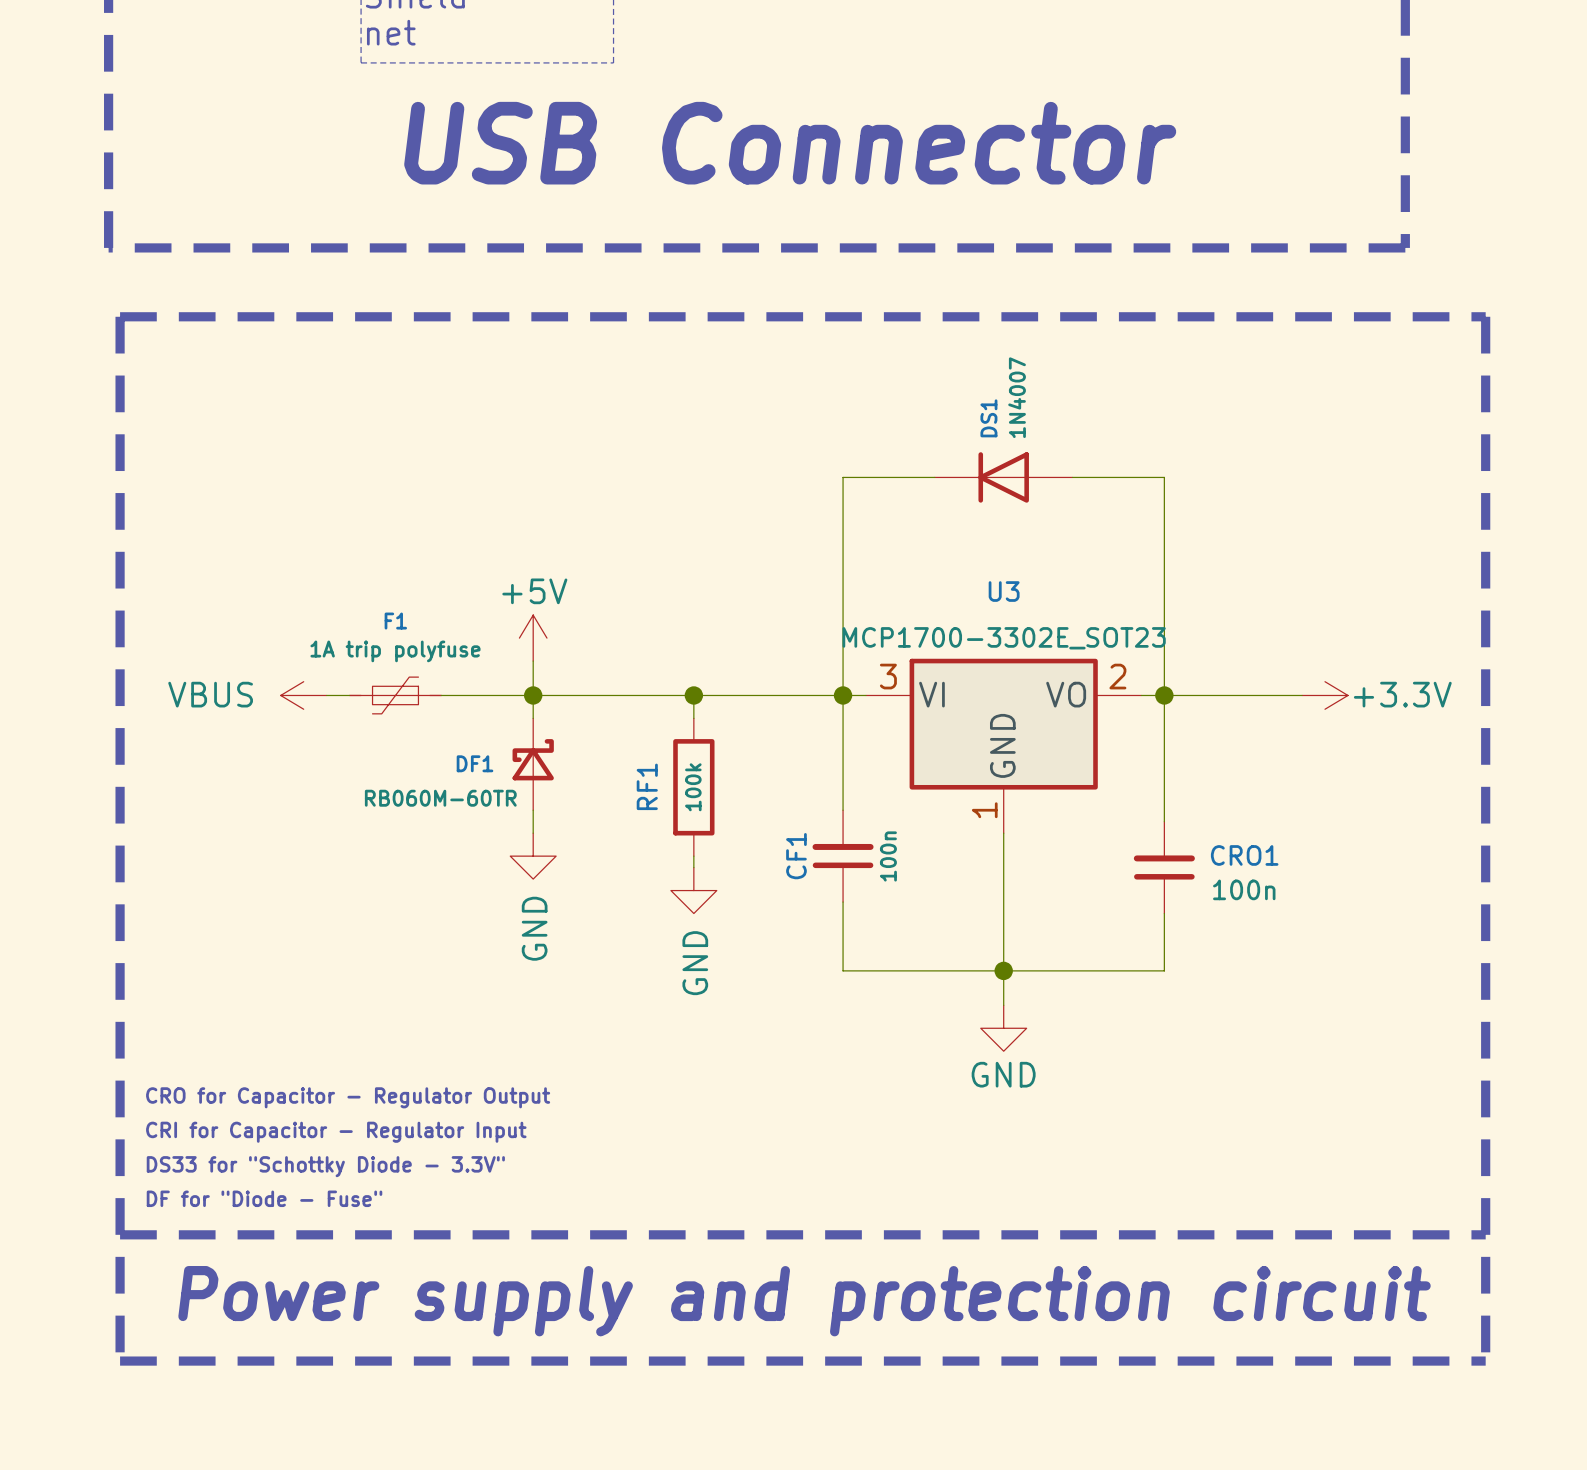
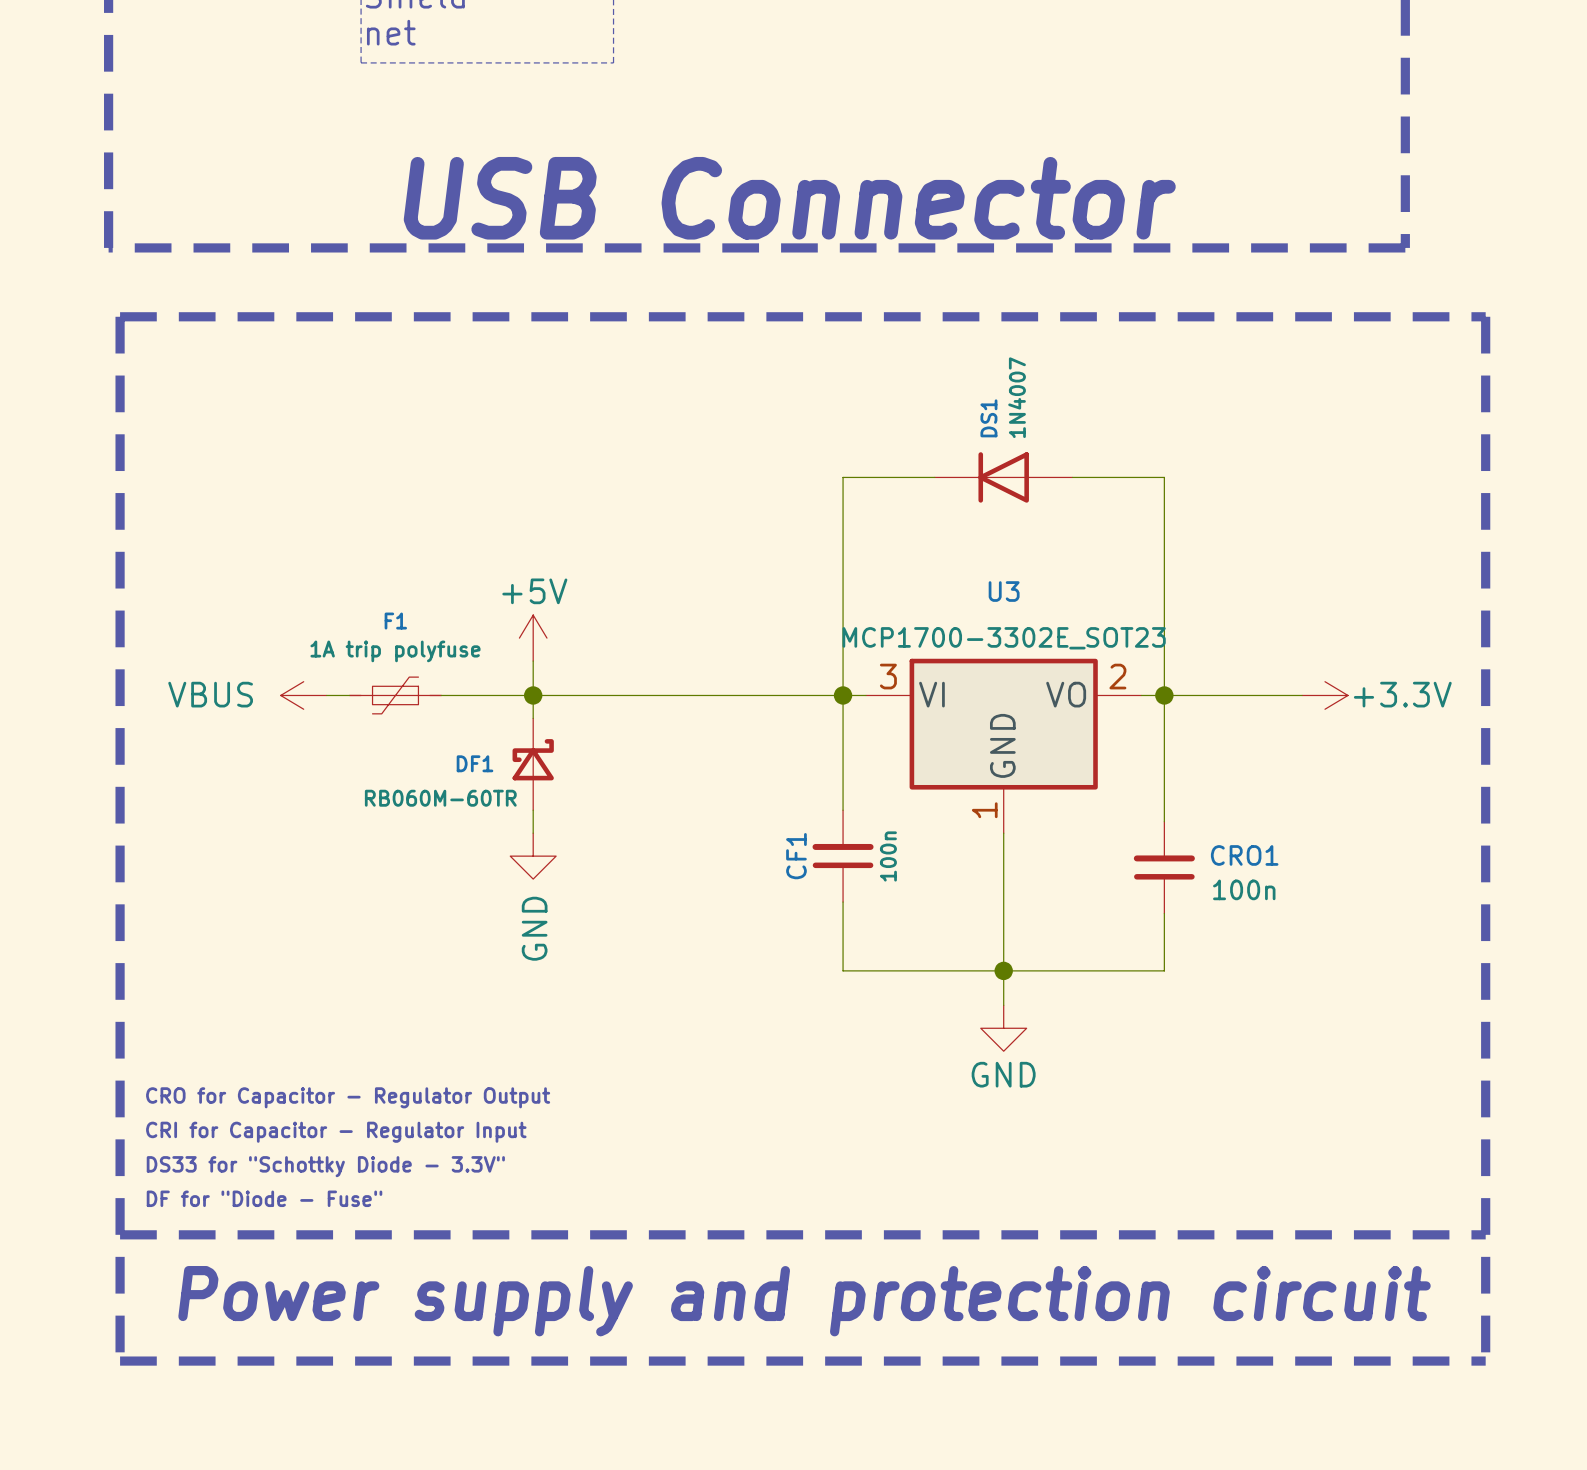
text position: USB Connector (790, 143) -> USB Connector (789, 198)
wire: (693, 695) (693, 718) -> none
junction: (693, 695) -> none
RF1: 100k (693, 787) -> none
wire: (693, 856) (693, 867) -> none
power symbol: GND (693, 890) -> none

